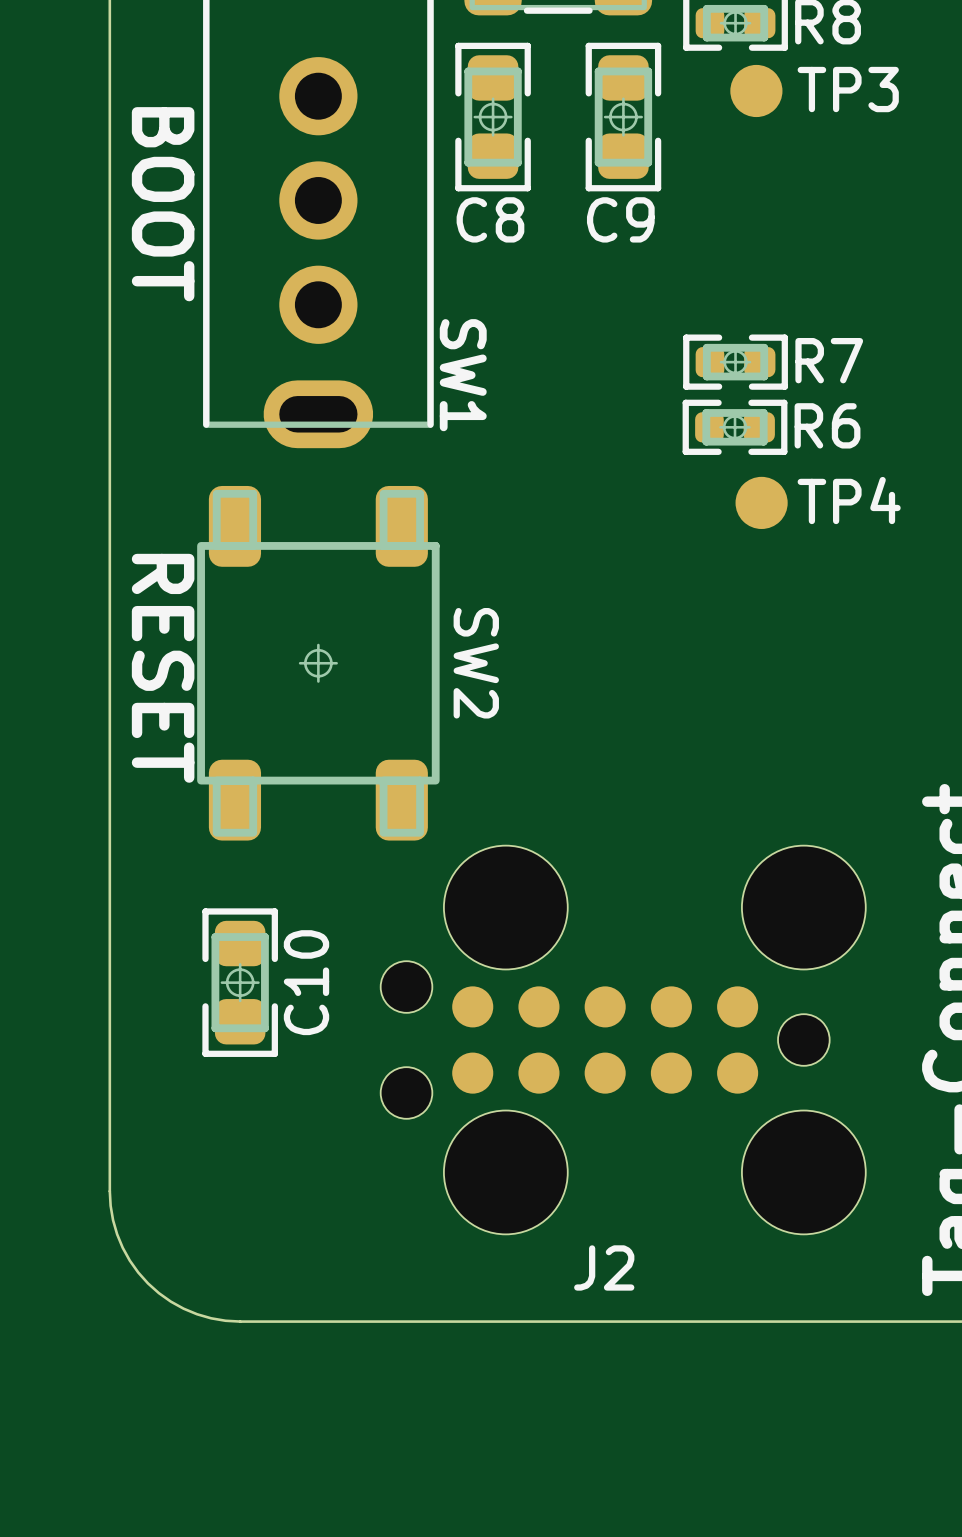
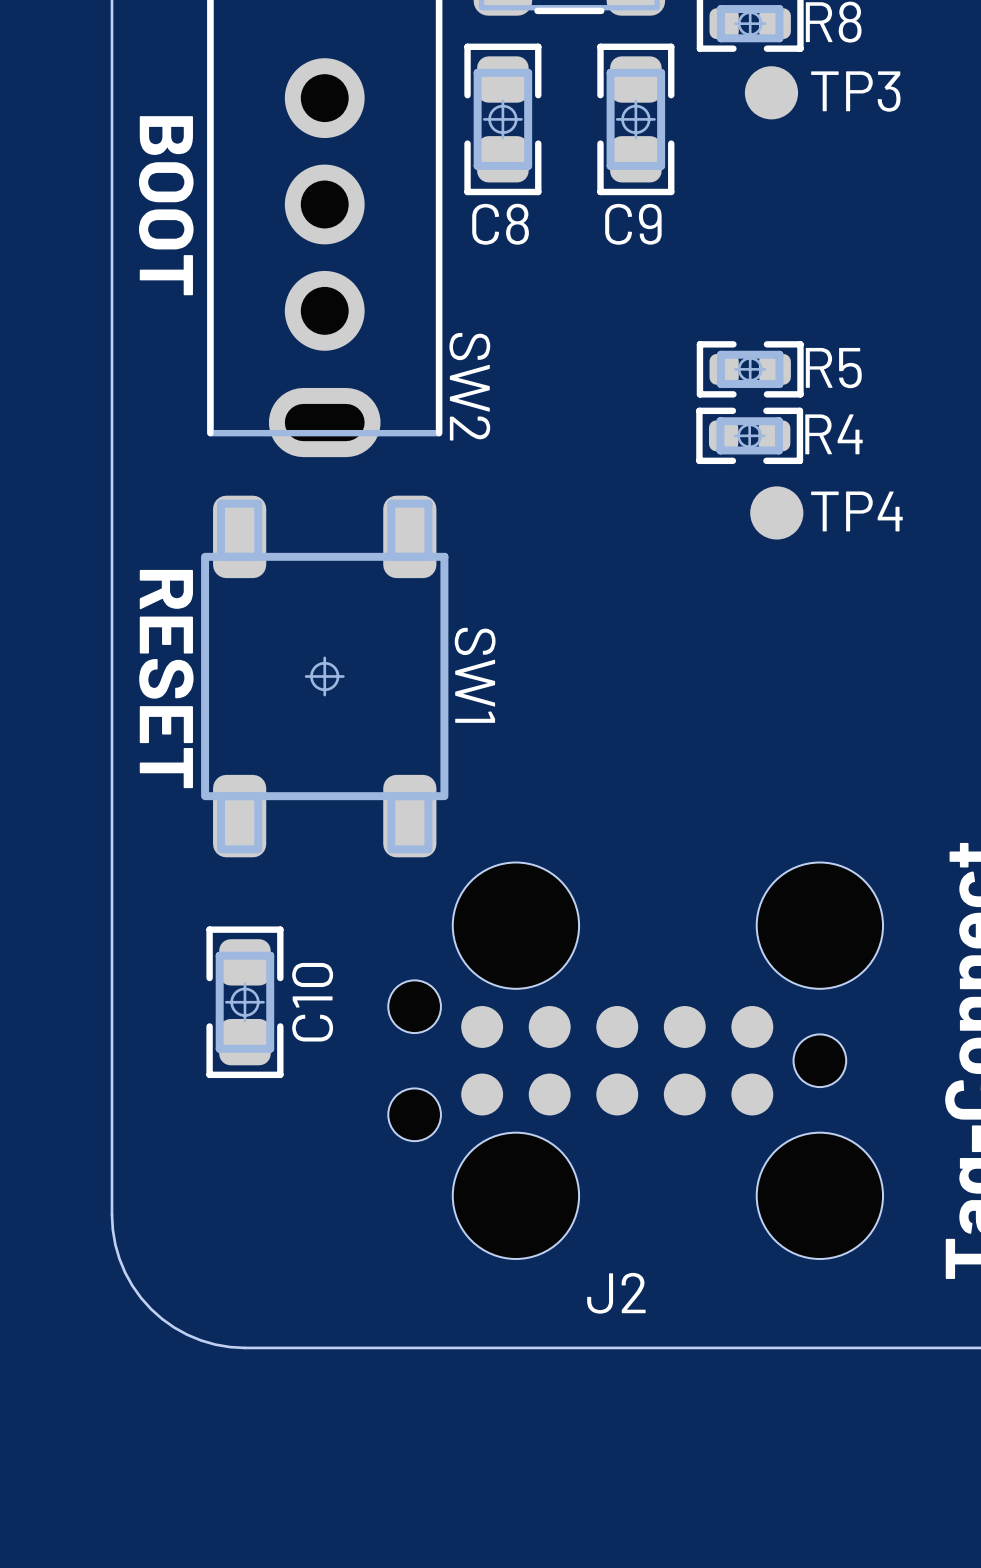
R7 name: R7 (829, 360) -> R5 (833, 368)
SW1 name: SW1 (463, 375) -> SW2 (469, 386)
R6 name: R6 (827, 425) -> R4 (834, 434)
SW2 name: SW2 (476, 663) -> SW1 (475, 675)

